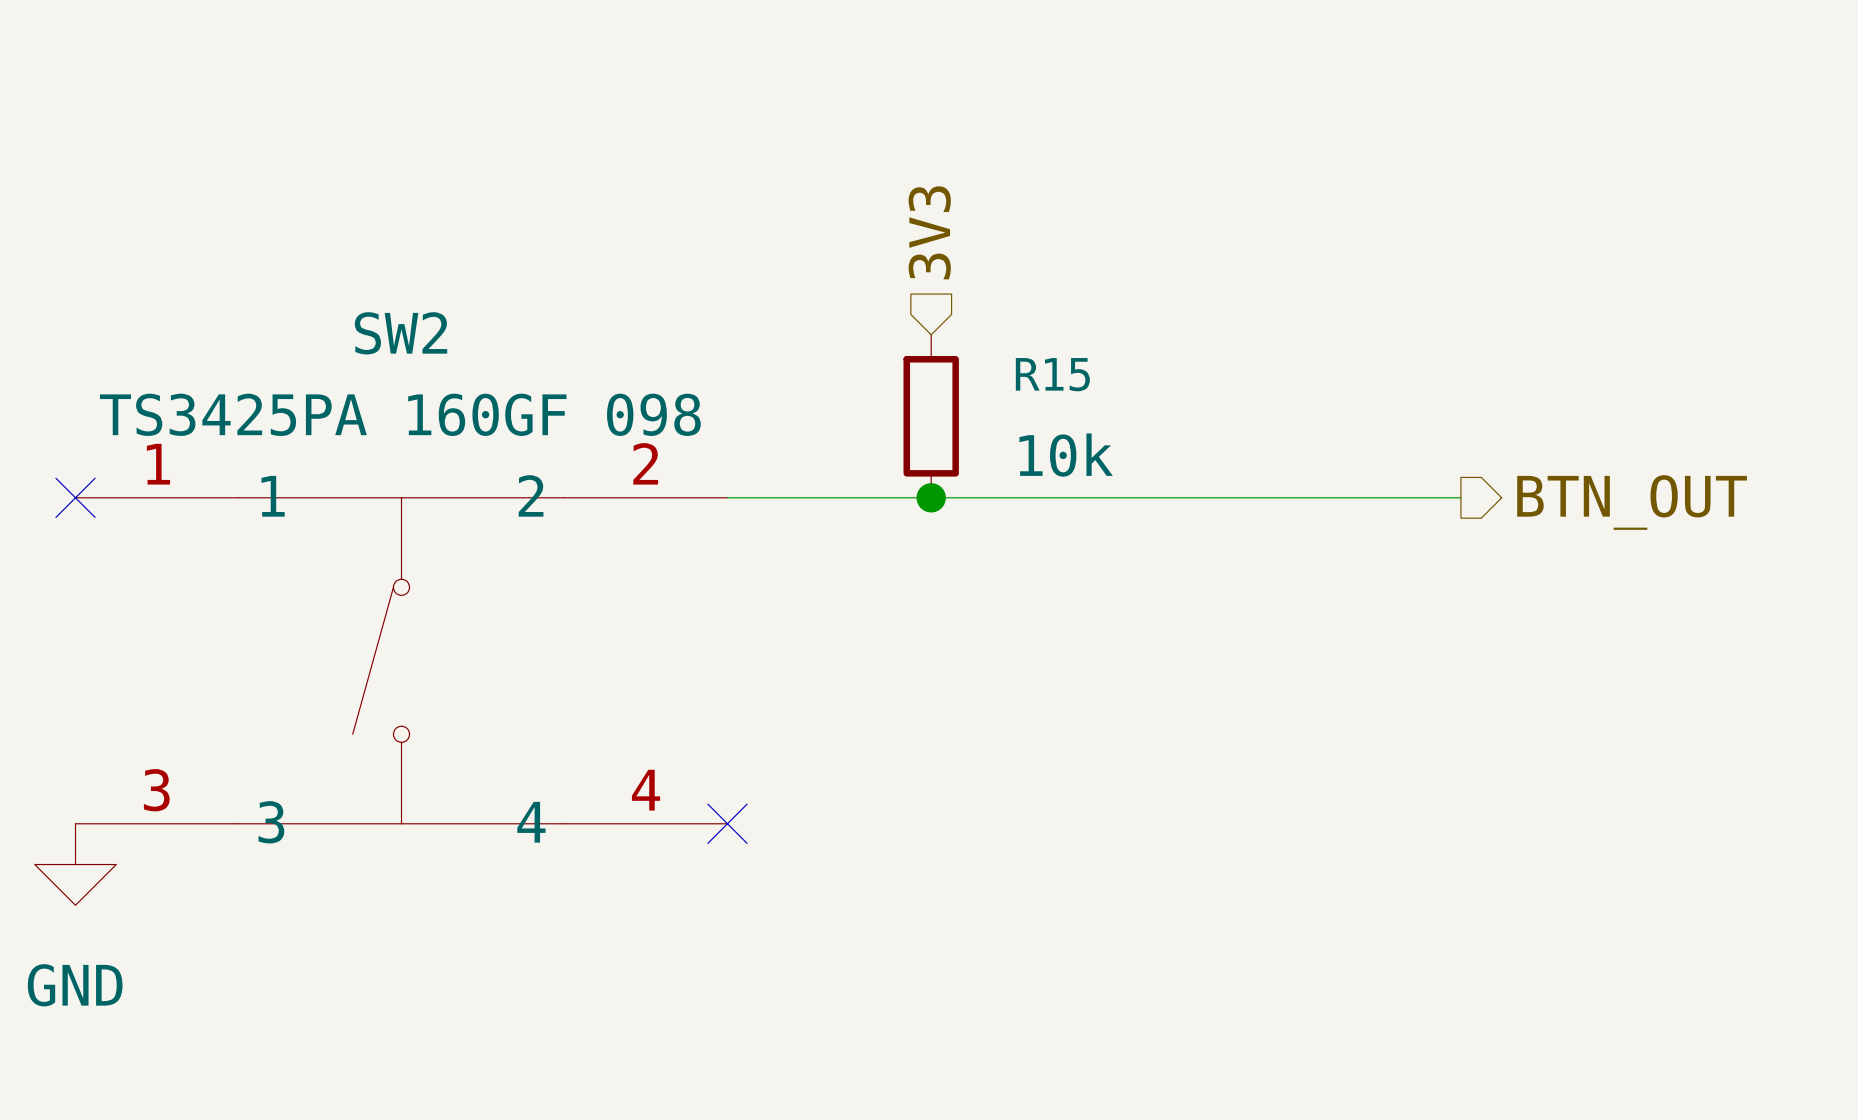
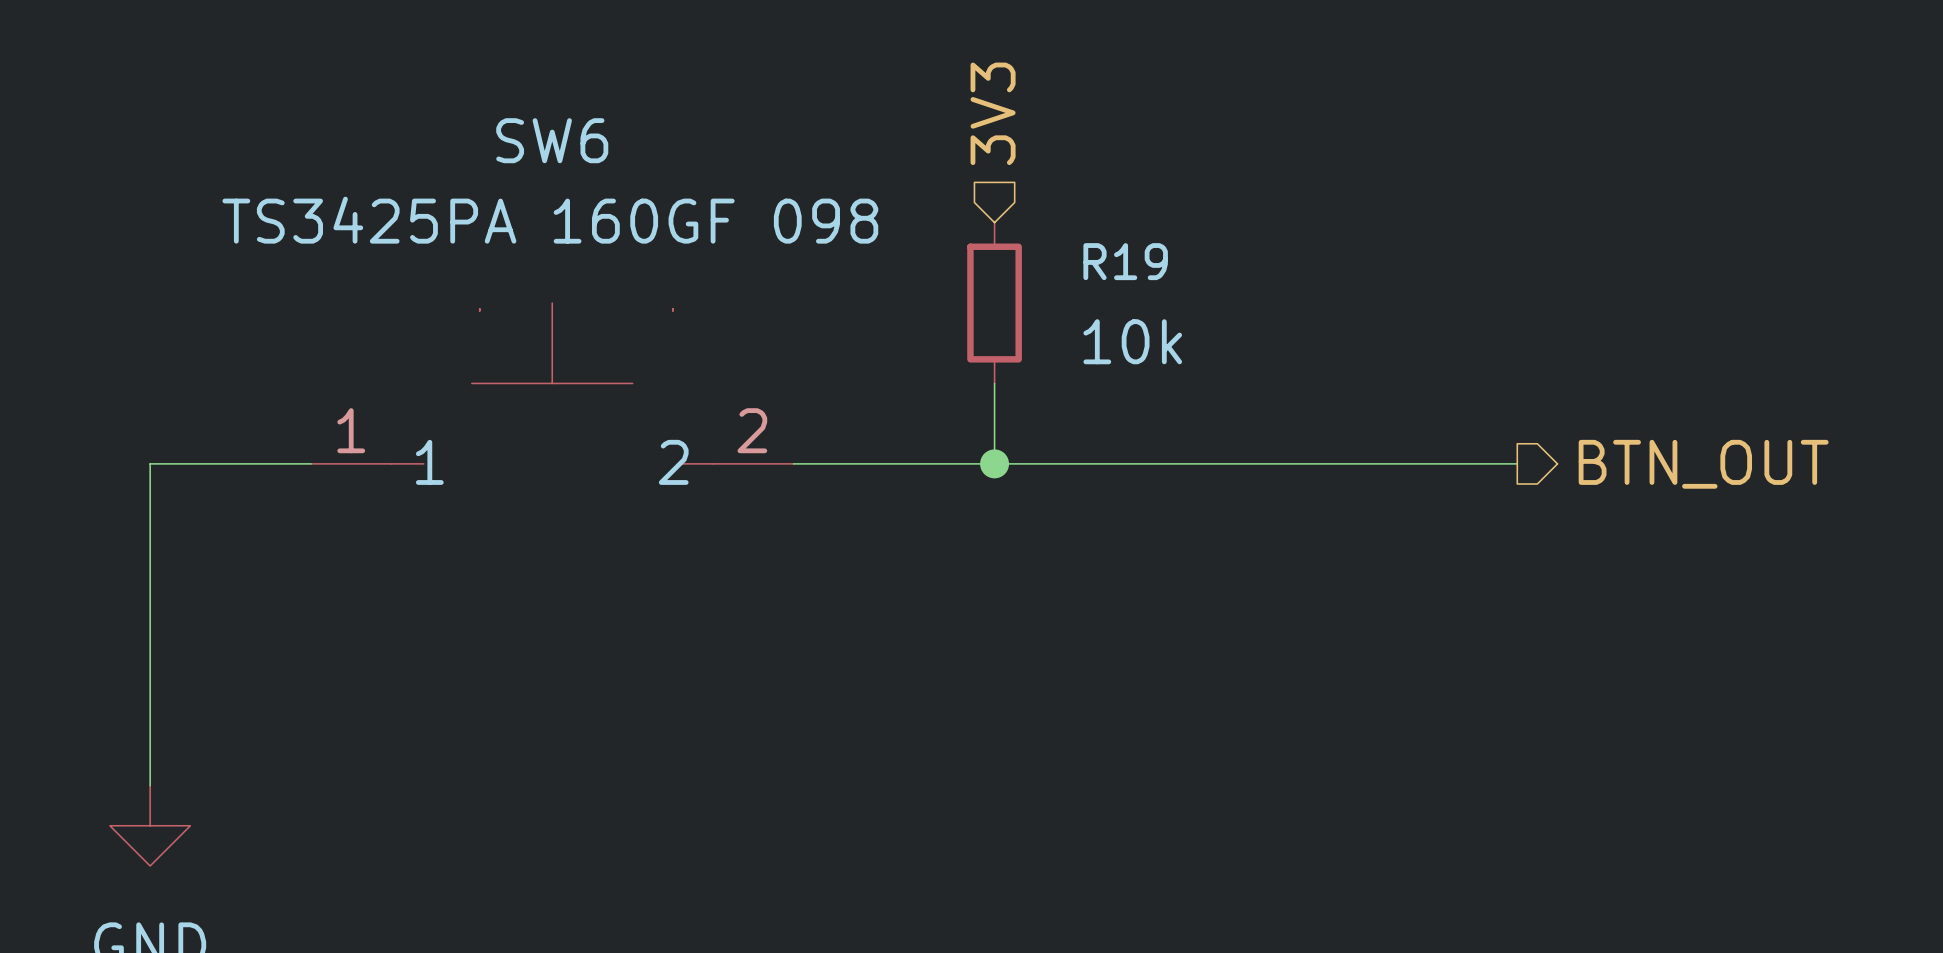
hierarchical label position: 3V3 (929, 232) -> 3V3 (993, 113)
R19: none -> 10k (994, 303)
SW6: none -> TS3425PA 160GF 098 (552, 383)
wire: none -> (994, 383) (994, 463)
R15: 10k (931, 416) -> none
no-connect mark: (75, 497) -> none
wire: none -> (311, 463) (150, 463) (150, 785)
SW2: TS3425PA 160GF 098 (401, 660) -> none
no-connect mark: (727, 823) -> none

